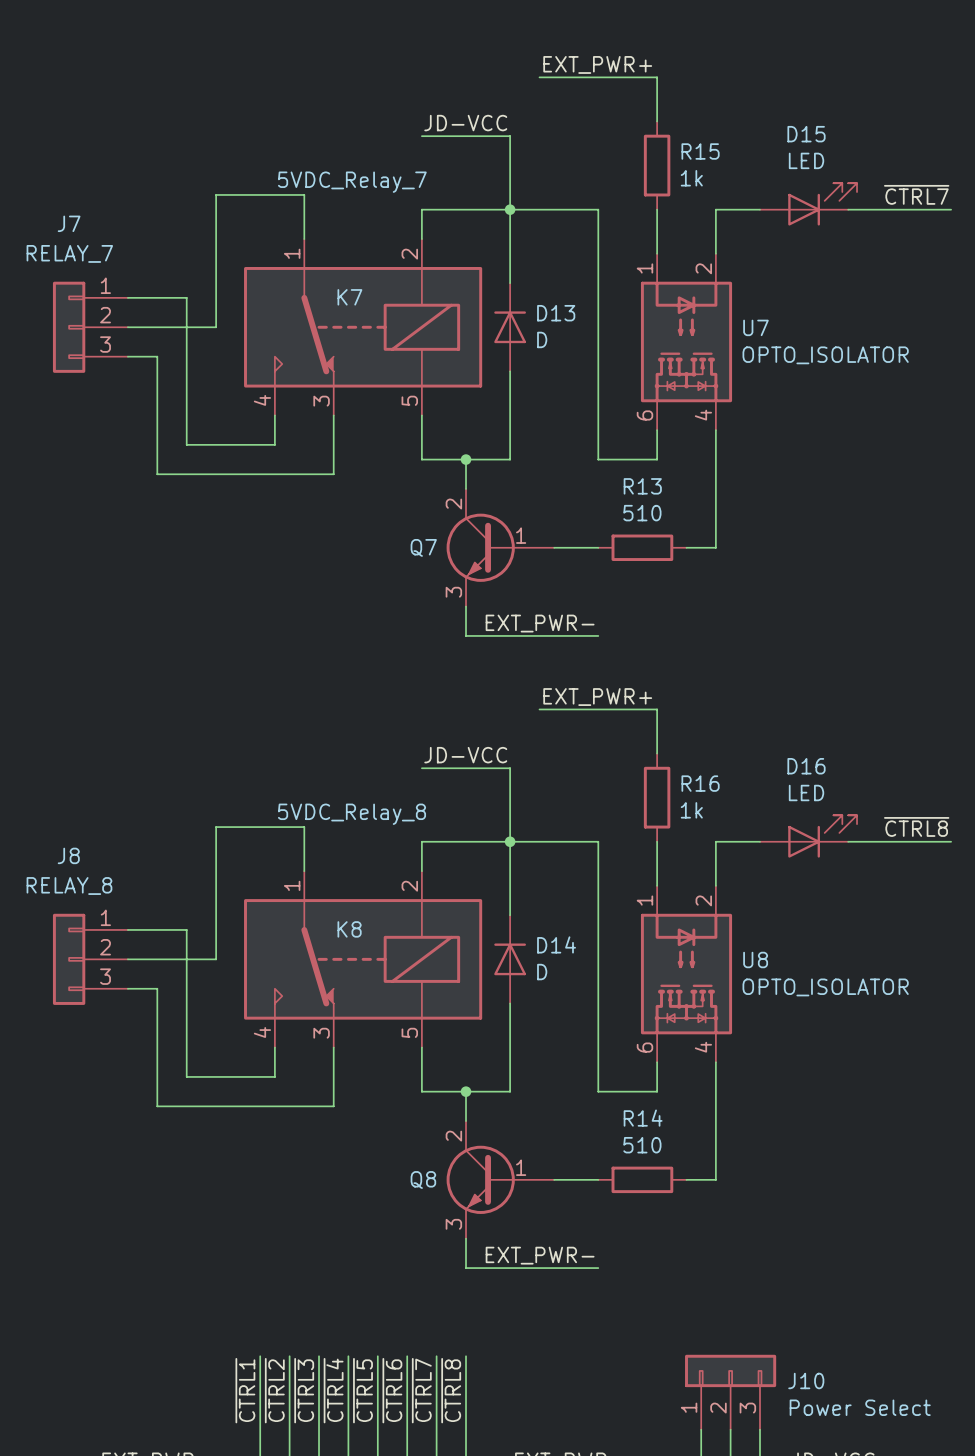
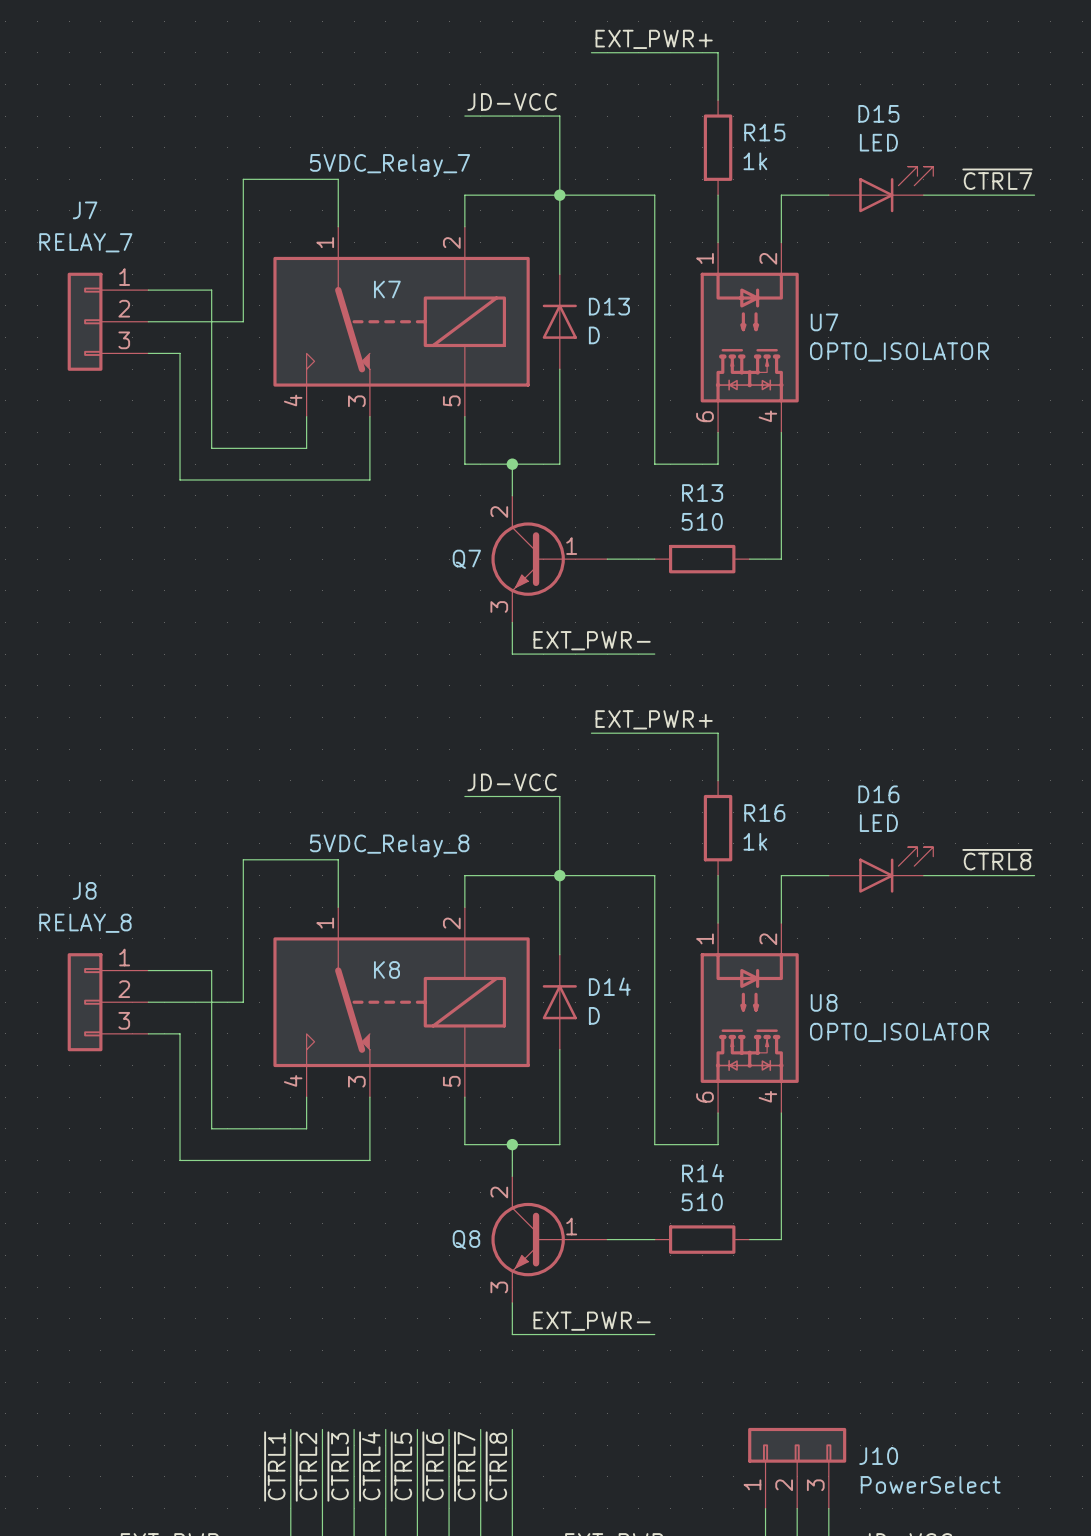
J10 value: Power Select (860, 1407) -> PowerSelect (930, 1484)

